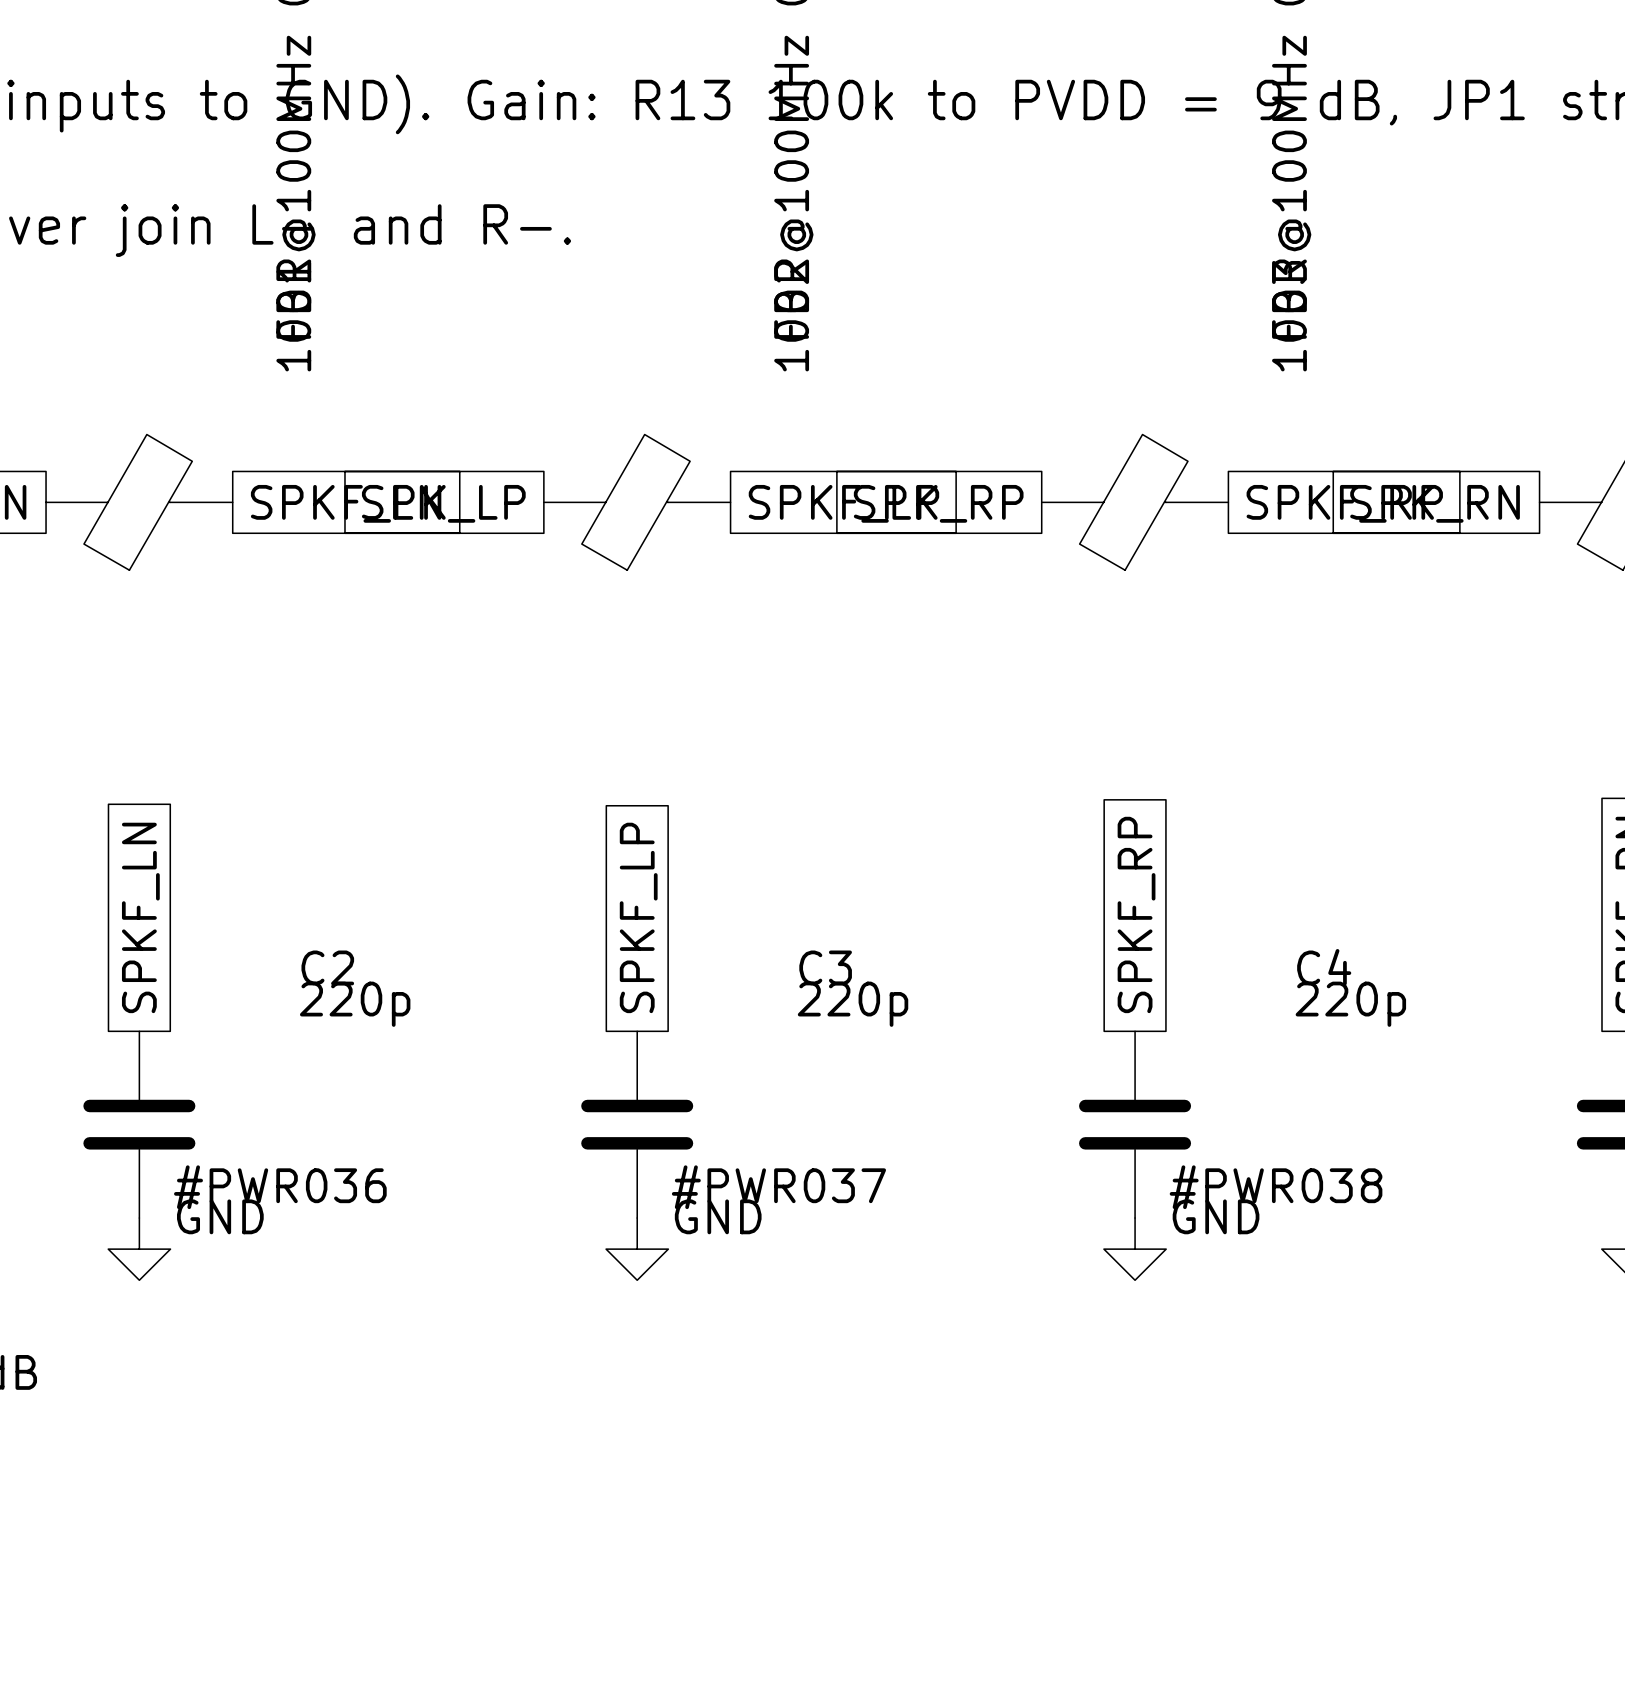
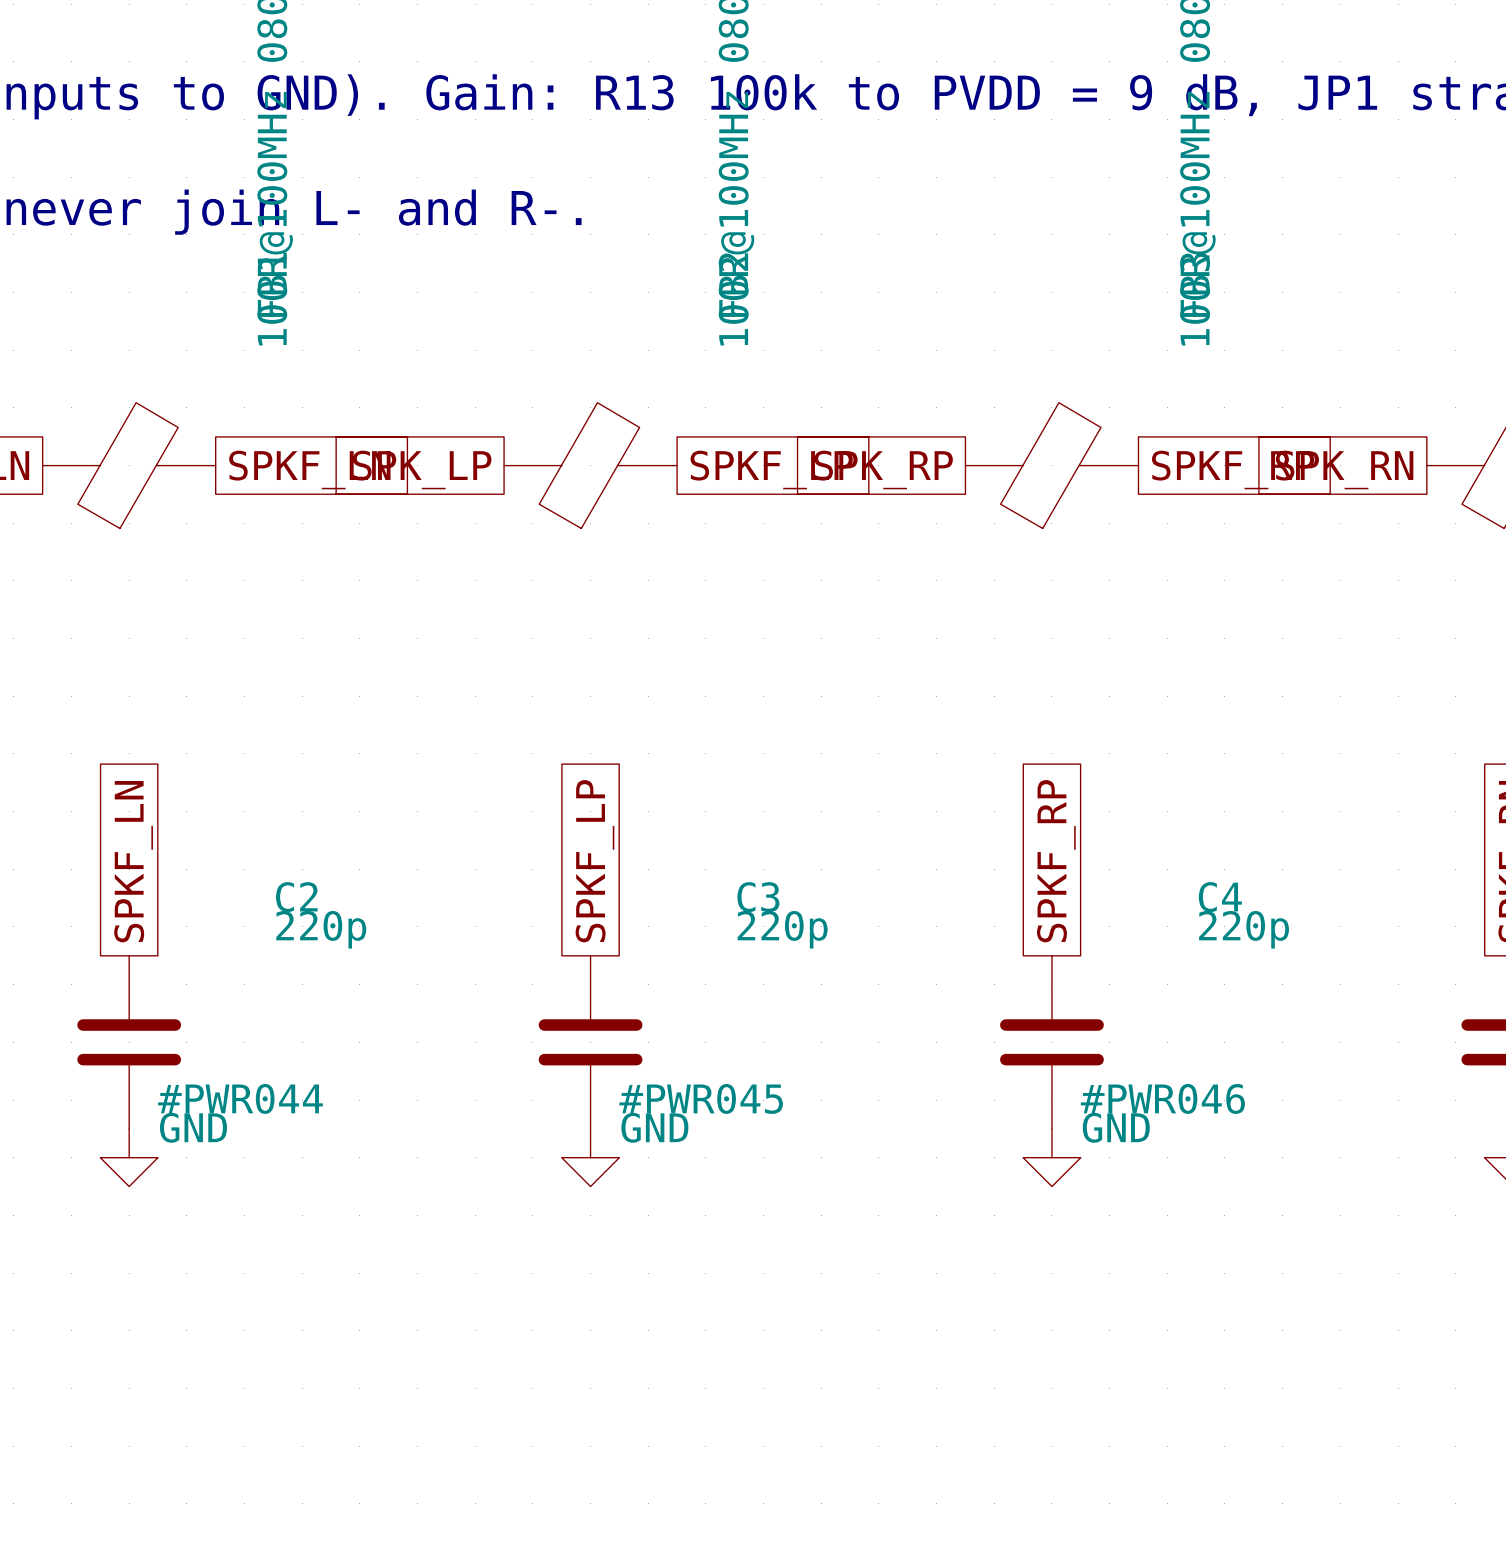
#PWR036 name: #PWR036 (280, 1187) -> #PWR044 (240, 1098)
#PWR037 name: #PWR037 (778, 1187) -> #PWR045 (701, 1098)
#PWR038 name: #PWR038 (1276, 1187) -> #PWR046 (1162, 1098)

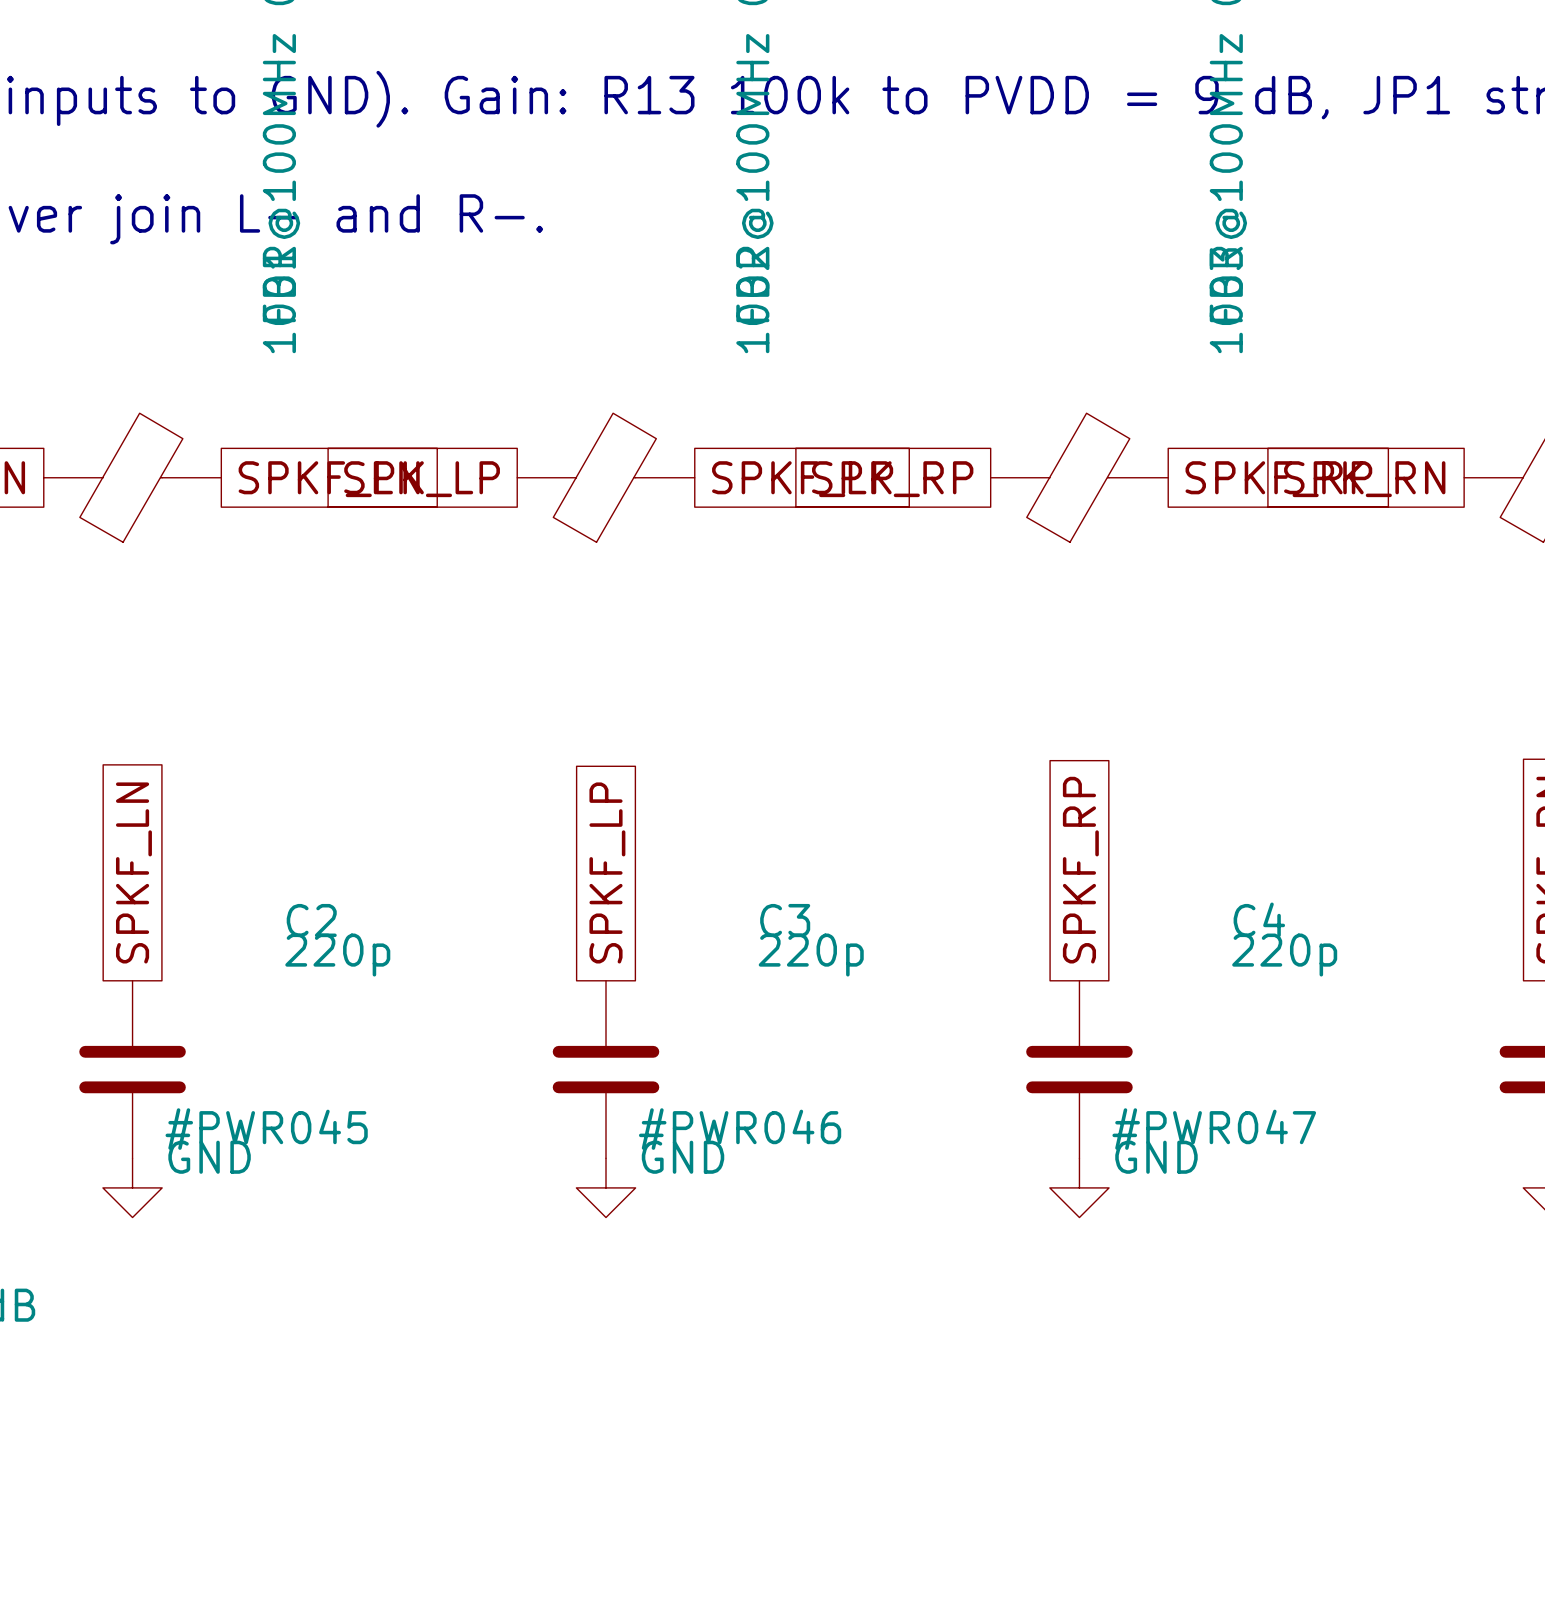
#PWR044 name: #PWR044 (240, 1098) -> #PWR045 (266, 1129)
#PWR045 name: #PWR045 (701, 1098) -> #PWR046 (740, 1129)
#PWR046 name: #PWR046 (1162, 1098) -> #PWR047 (1214, 1129)

